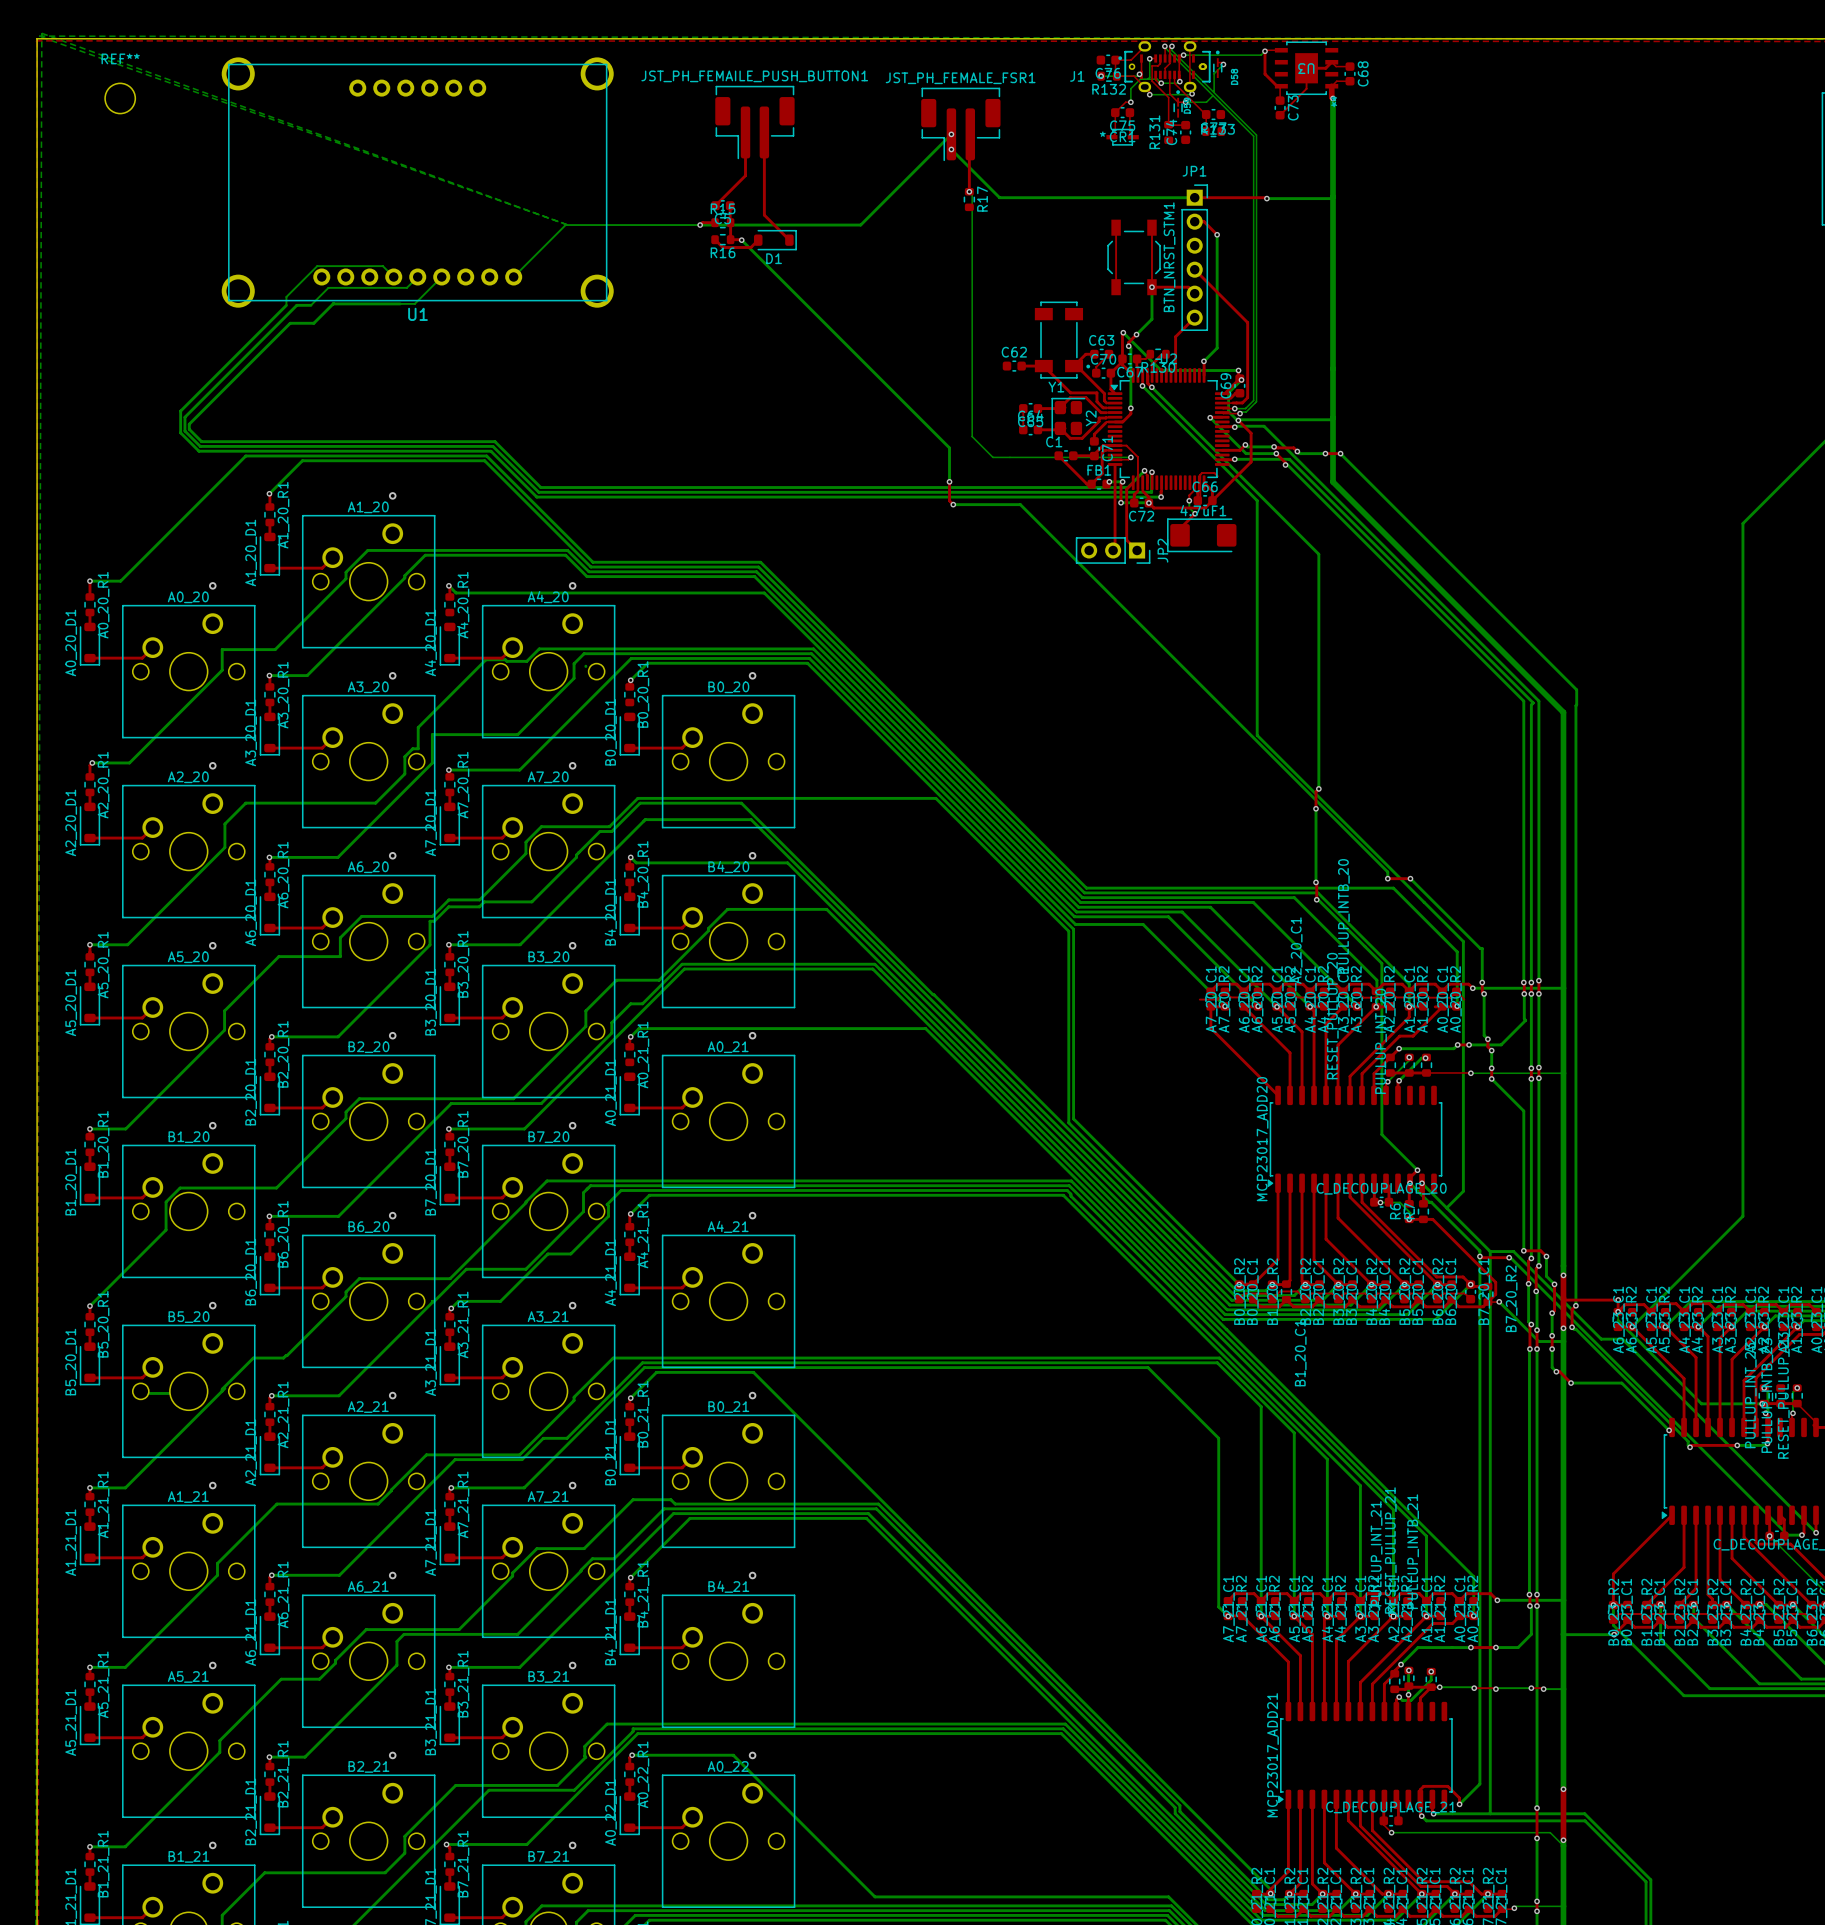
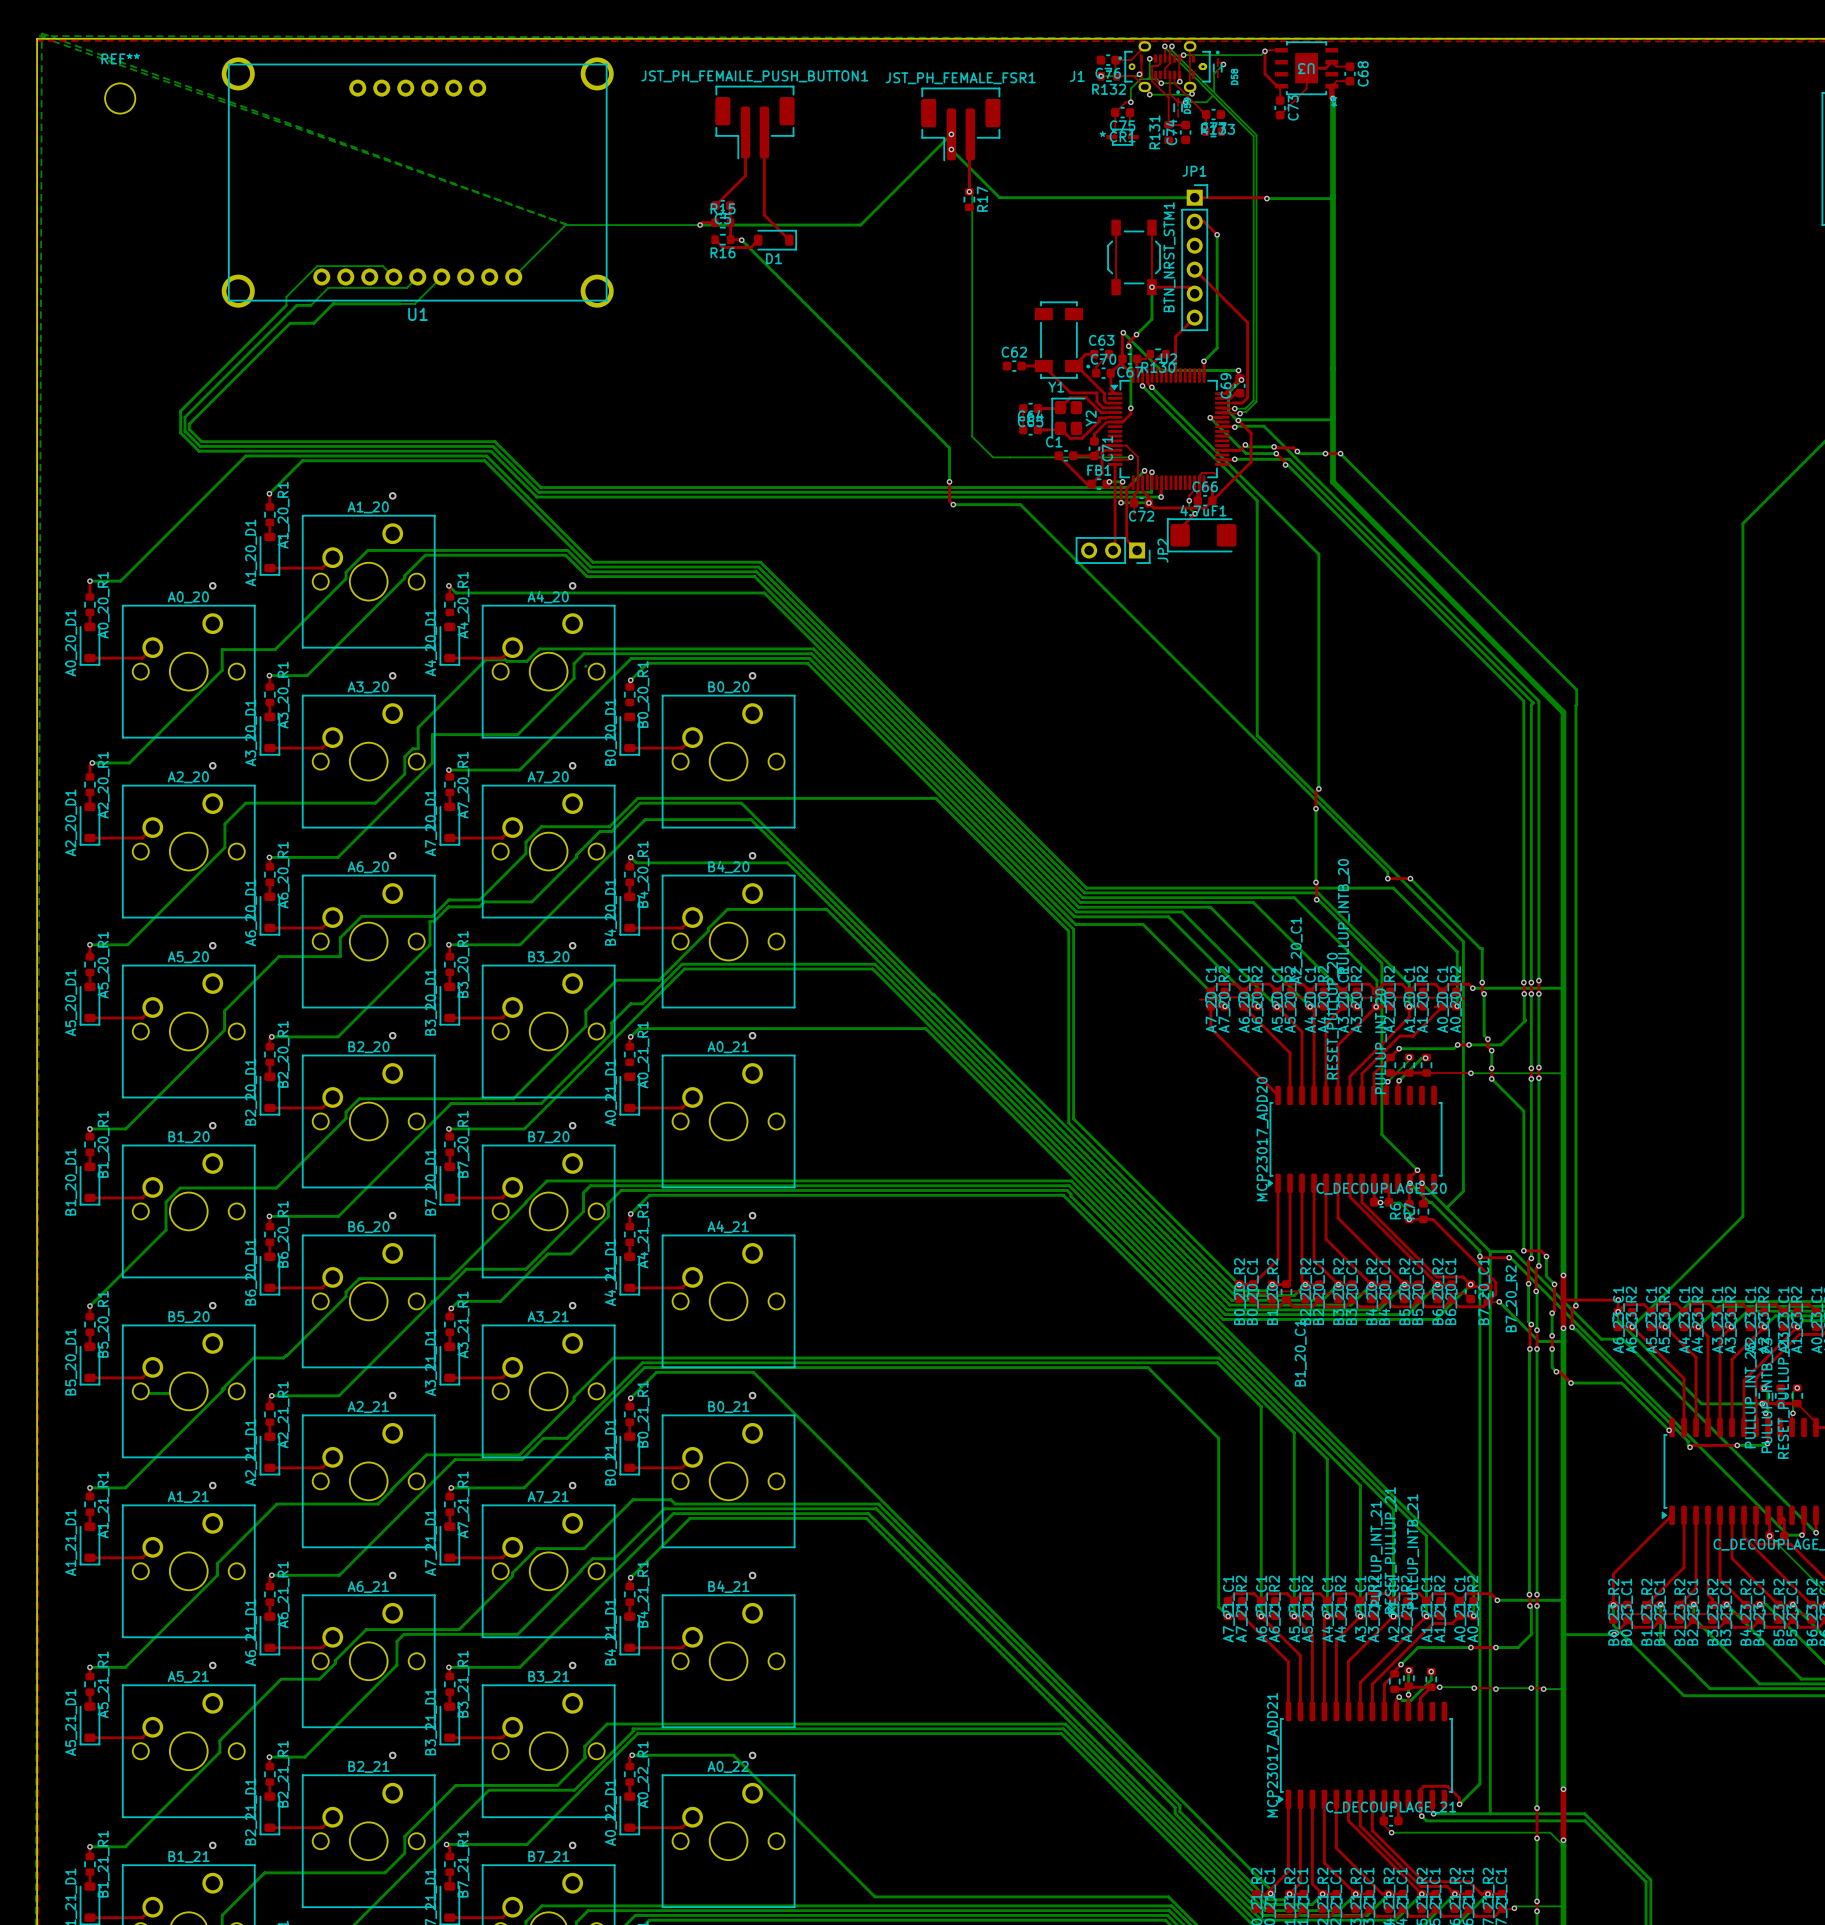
top track: none -> (1134, 503) (1134, 514)

